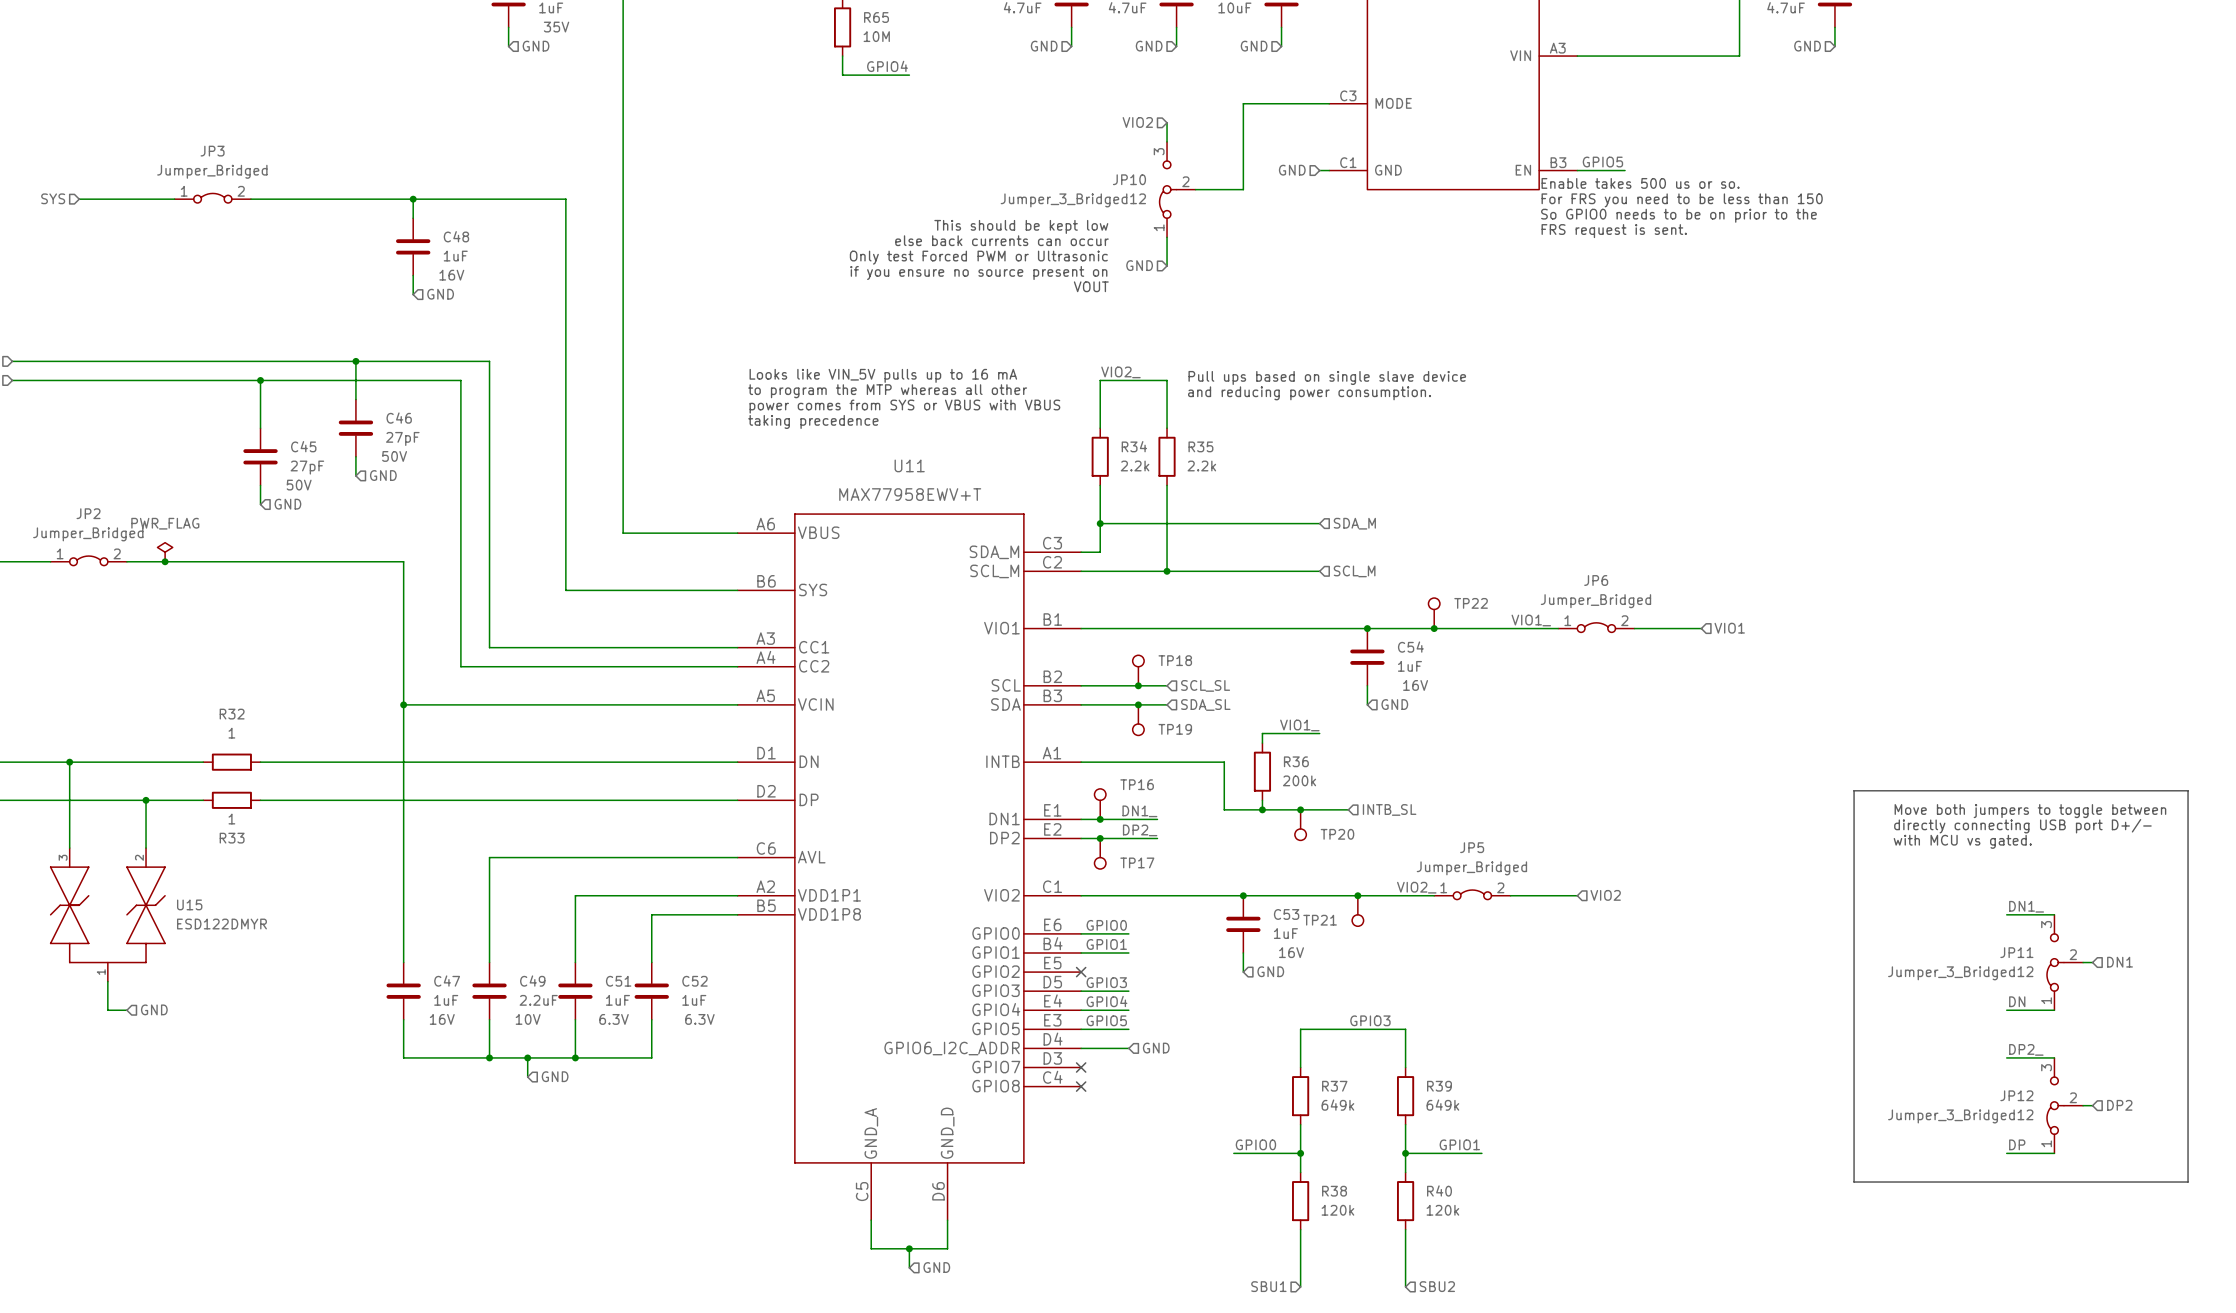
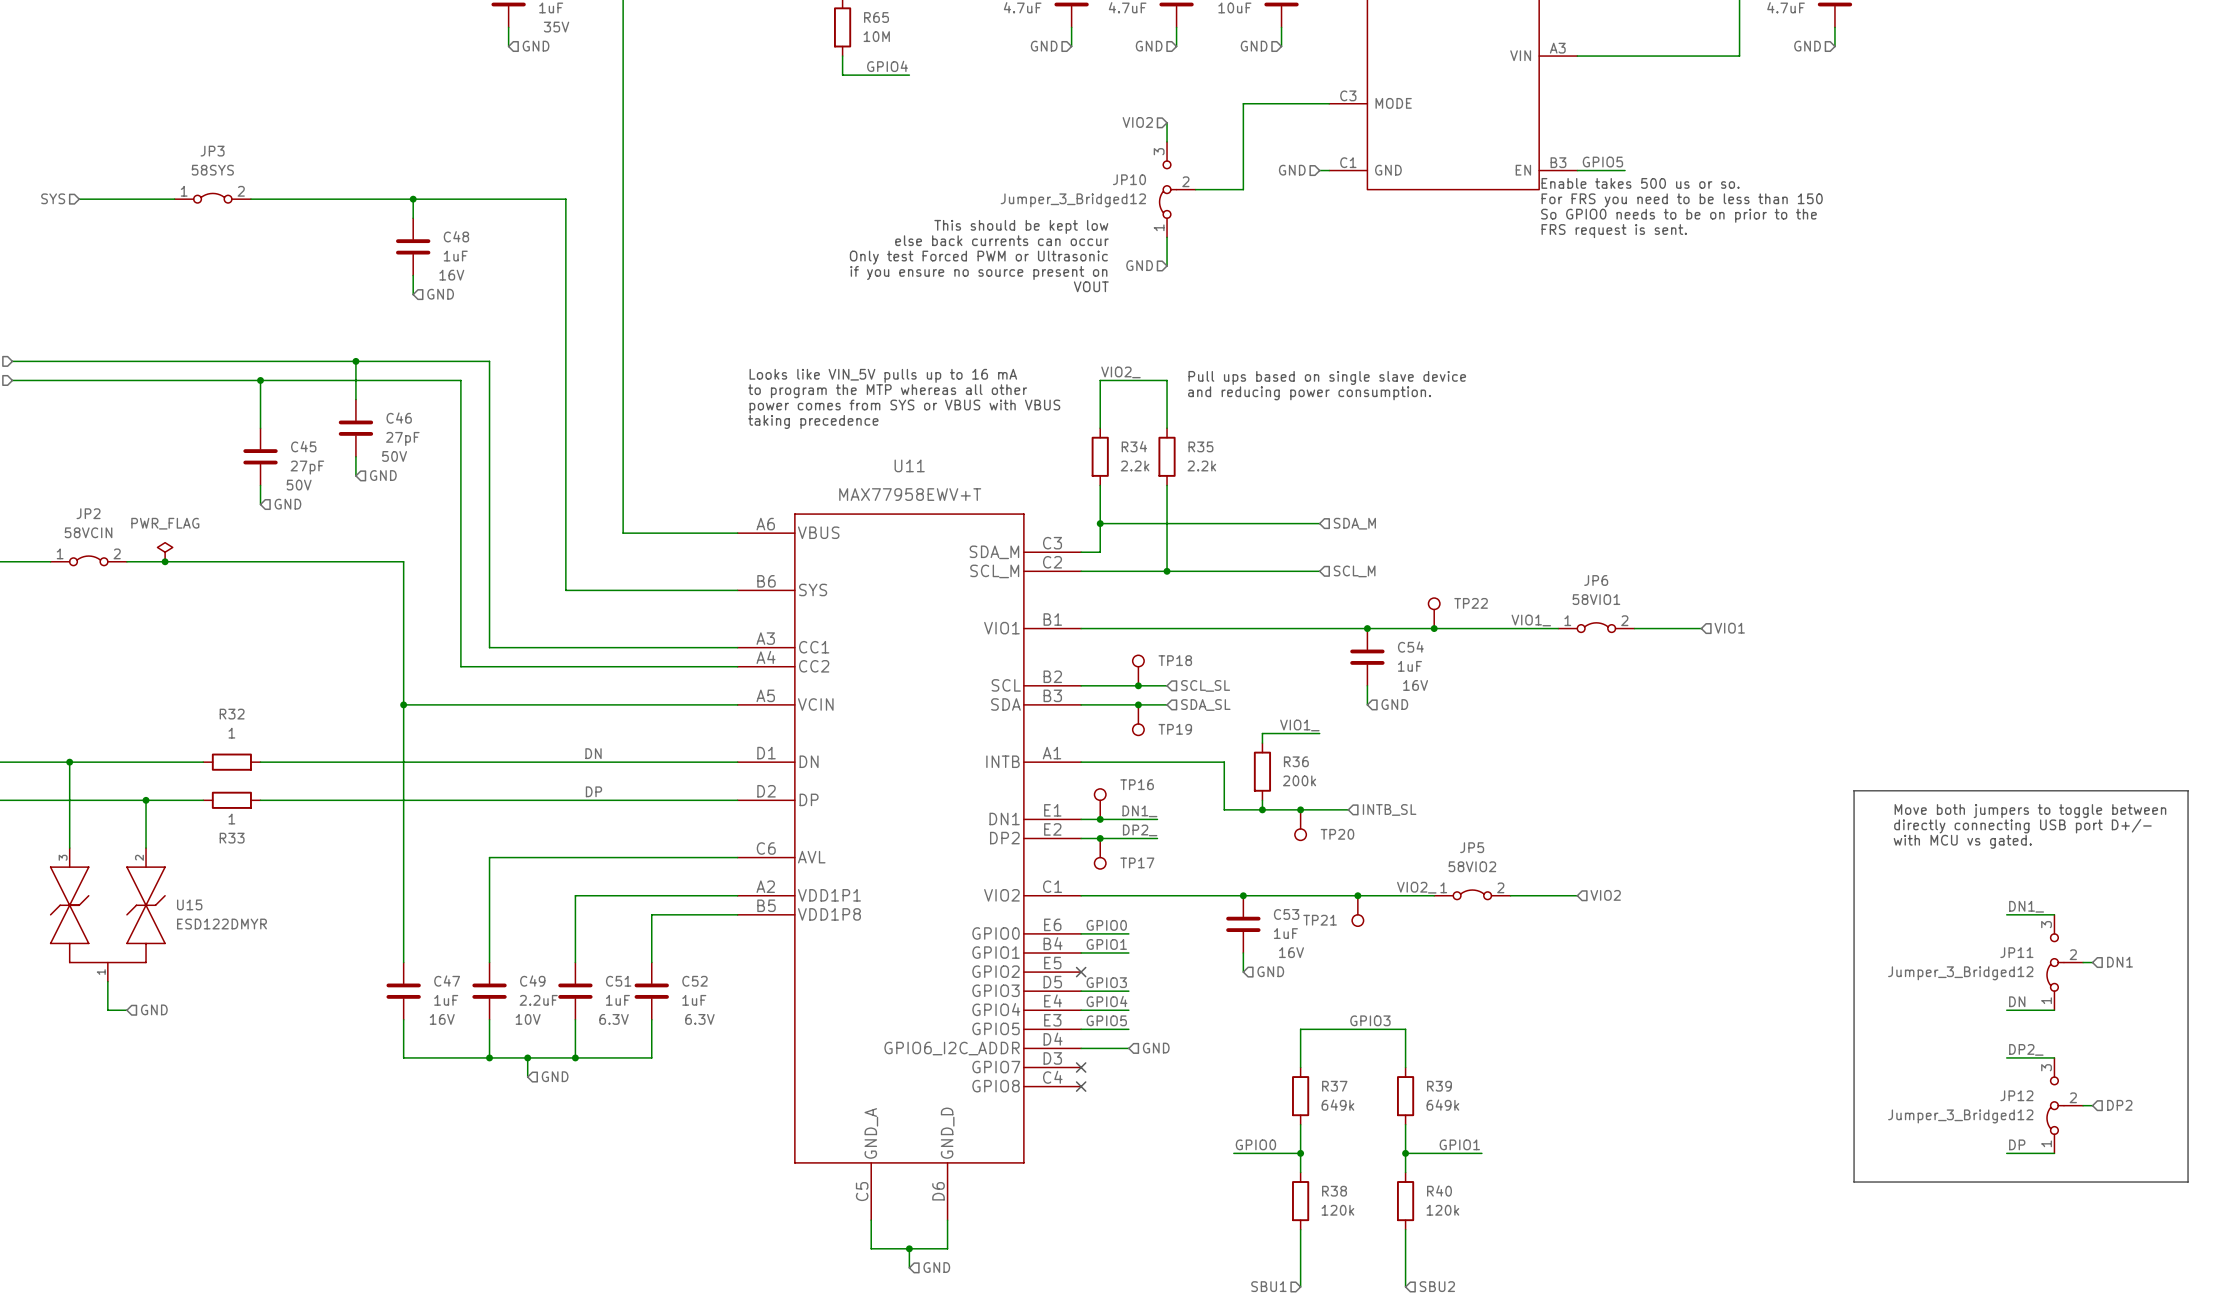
JP3 value: Jumper_Bridged (212, 171) -> 58SYS (212, 170)
JP2 value: Jumper_Bridged (88, 534) -> 58VCIN (88, 532)
JP6 value: Jumper_Bridged (1595, 601) -> 58VIO1 (1596, 599)
label: none -> DN (593, 753)
label: none -> DP (593, 791)
JP5 value: Jumper_Bridged (1471, 868) -> 58VIO2 (1472, 866)

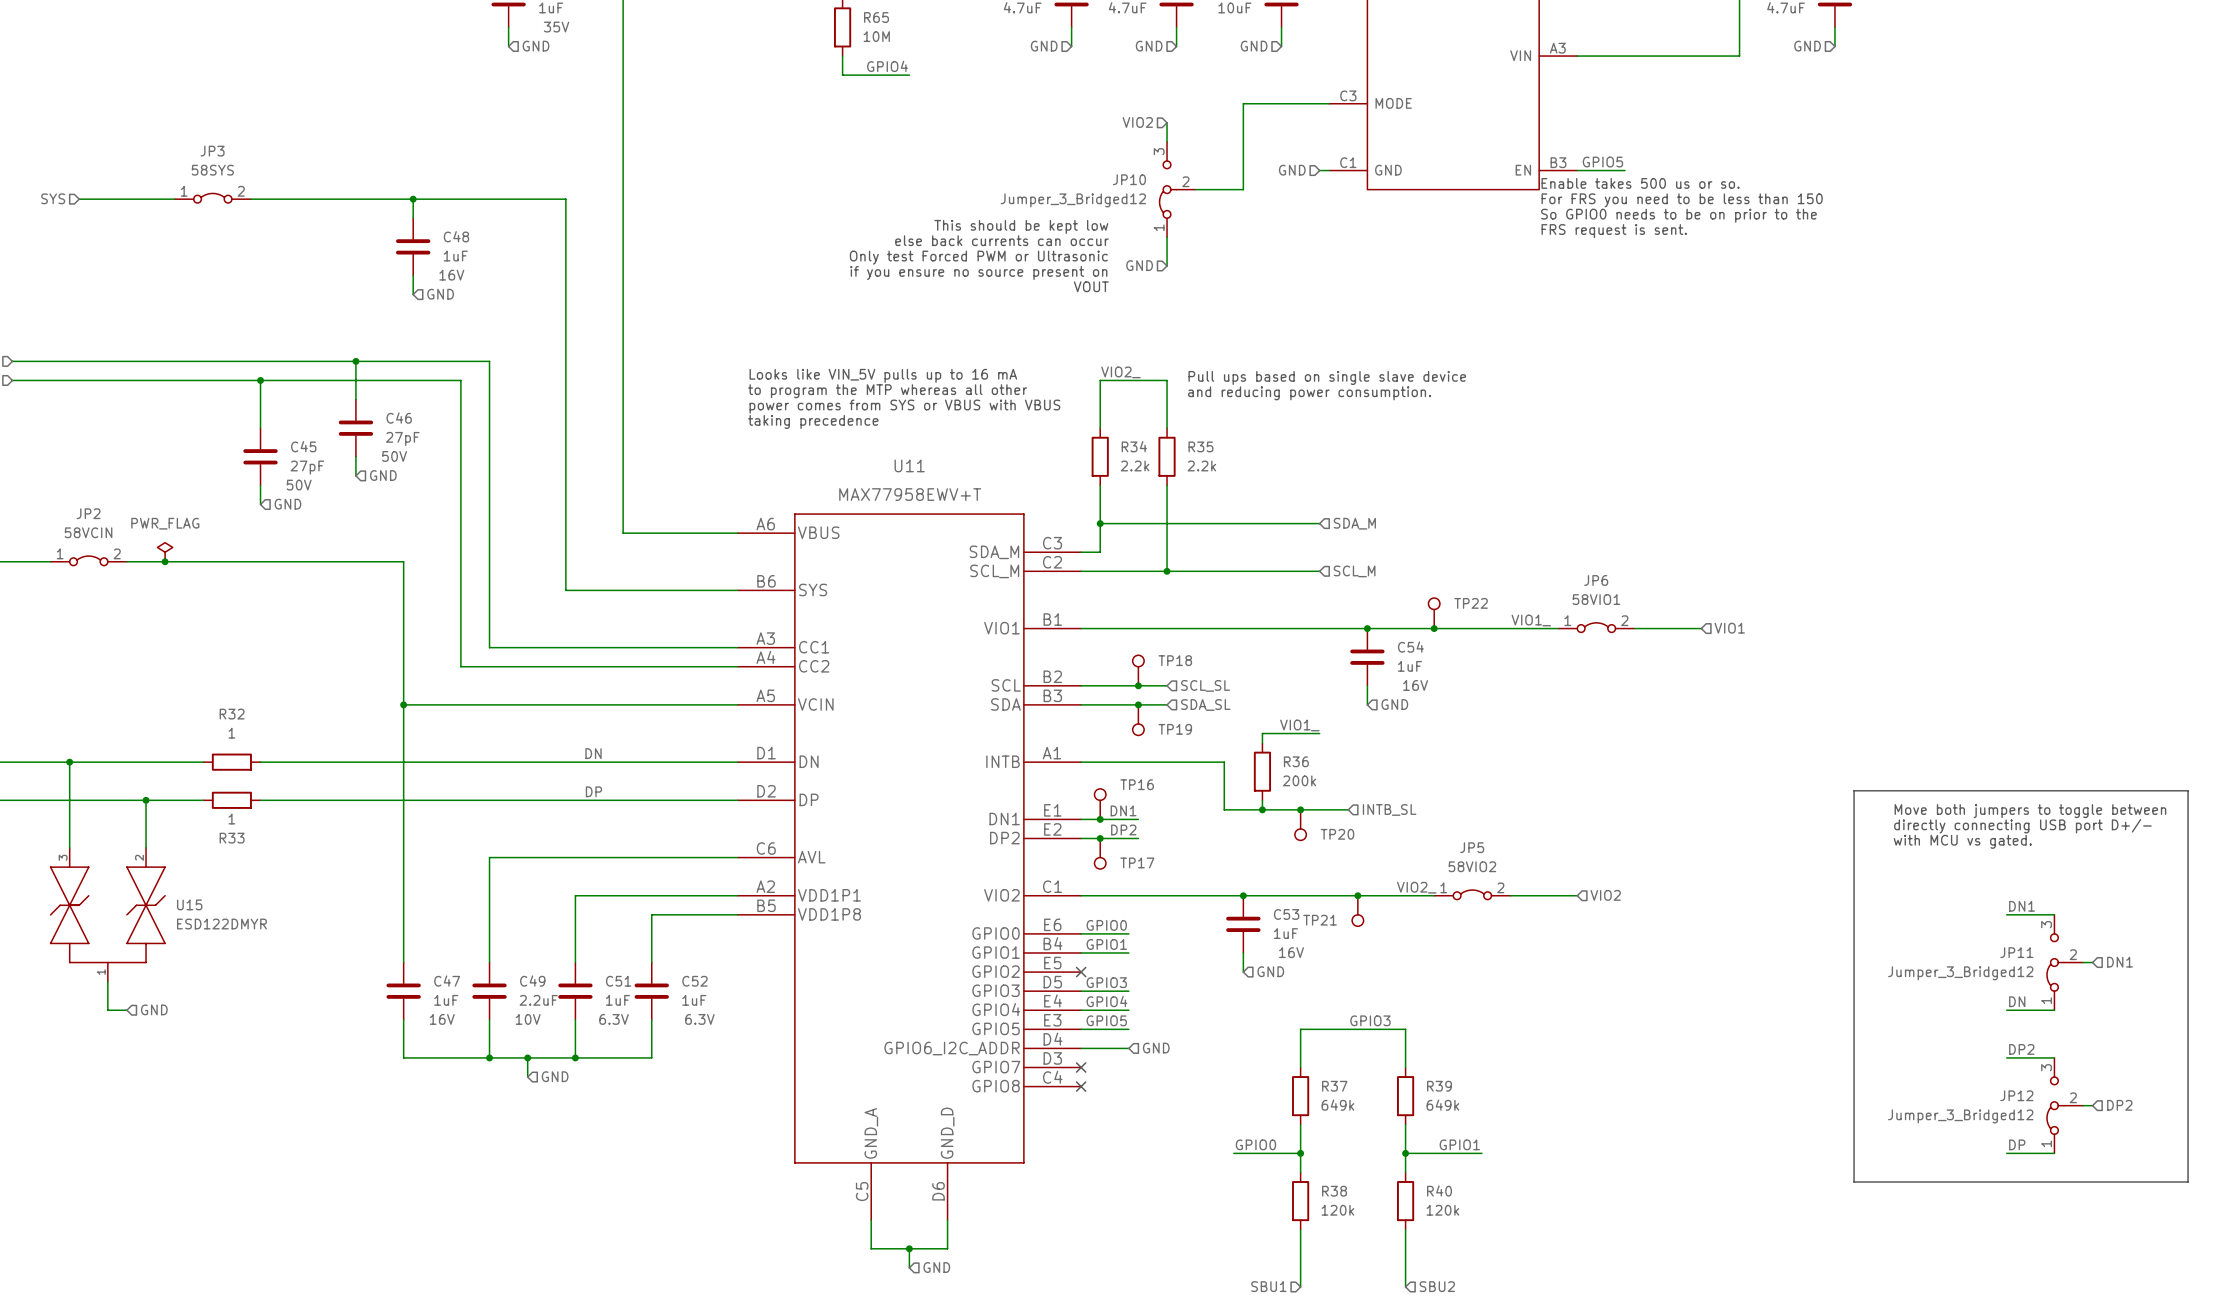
label: DN1_ (1139, 811) -> DN1 (1123, 810)
wire: (1138, 819) (1157, 819) -> none
label: DP2_ (1140, 830) -> DP2 (1123, 829)
wire: (1138, 838) (1157, 838) -> none
label: DN1_ (2026, 906) -> DN1 (2022, 906)
label: DP2_ (2026, 1049) -> DP2 (2021, 1049)

